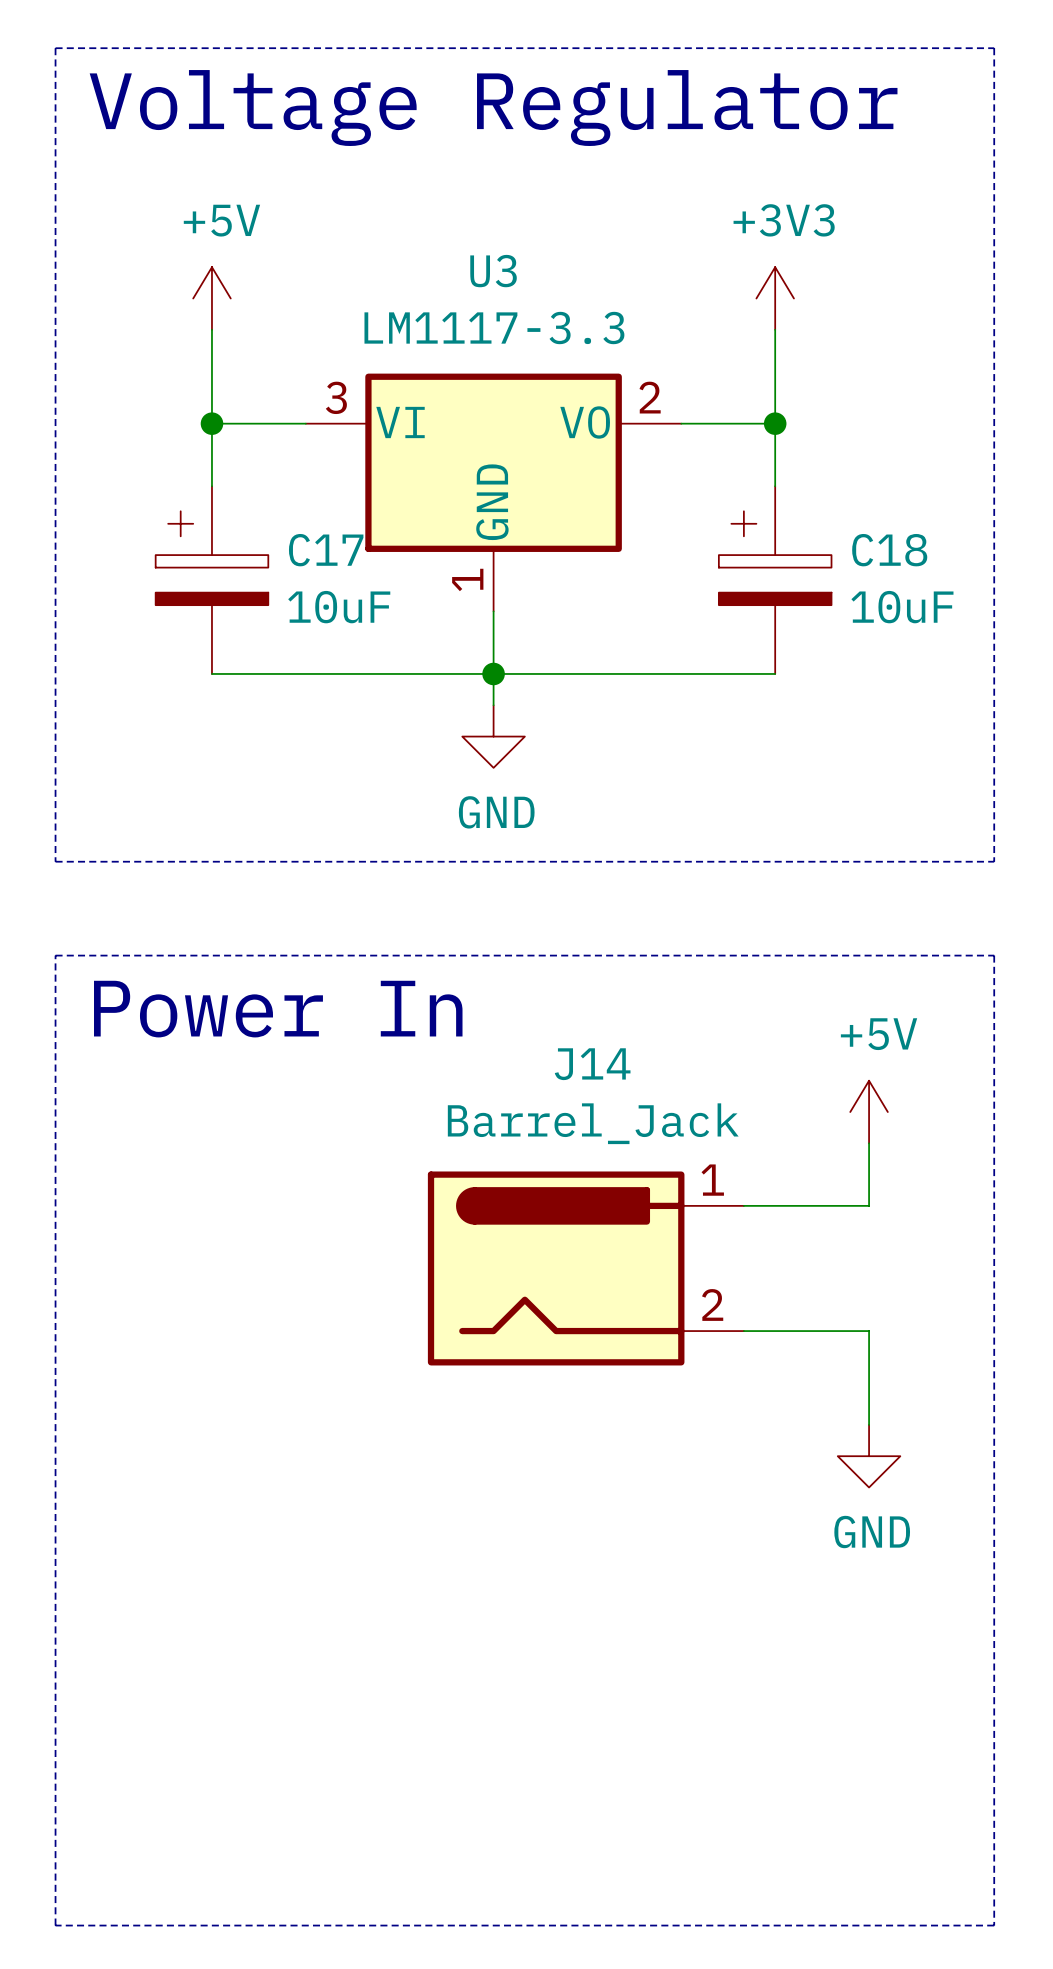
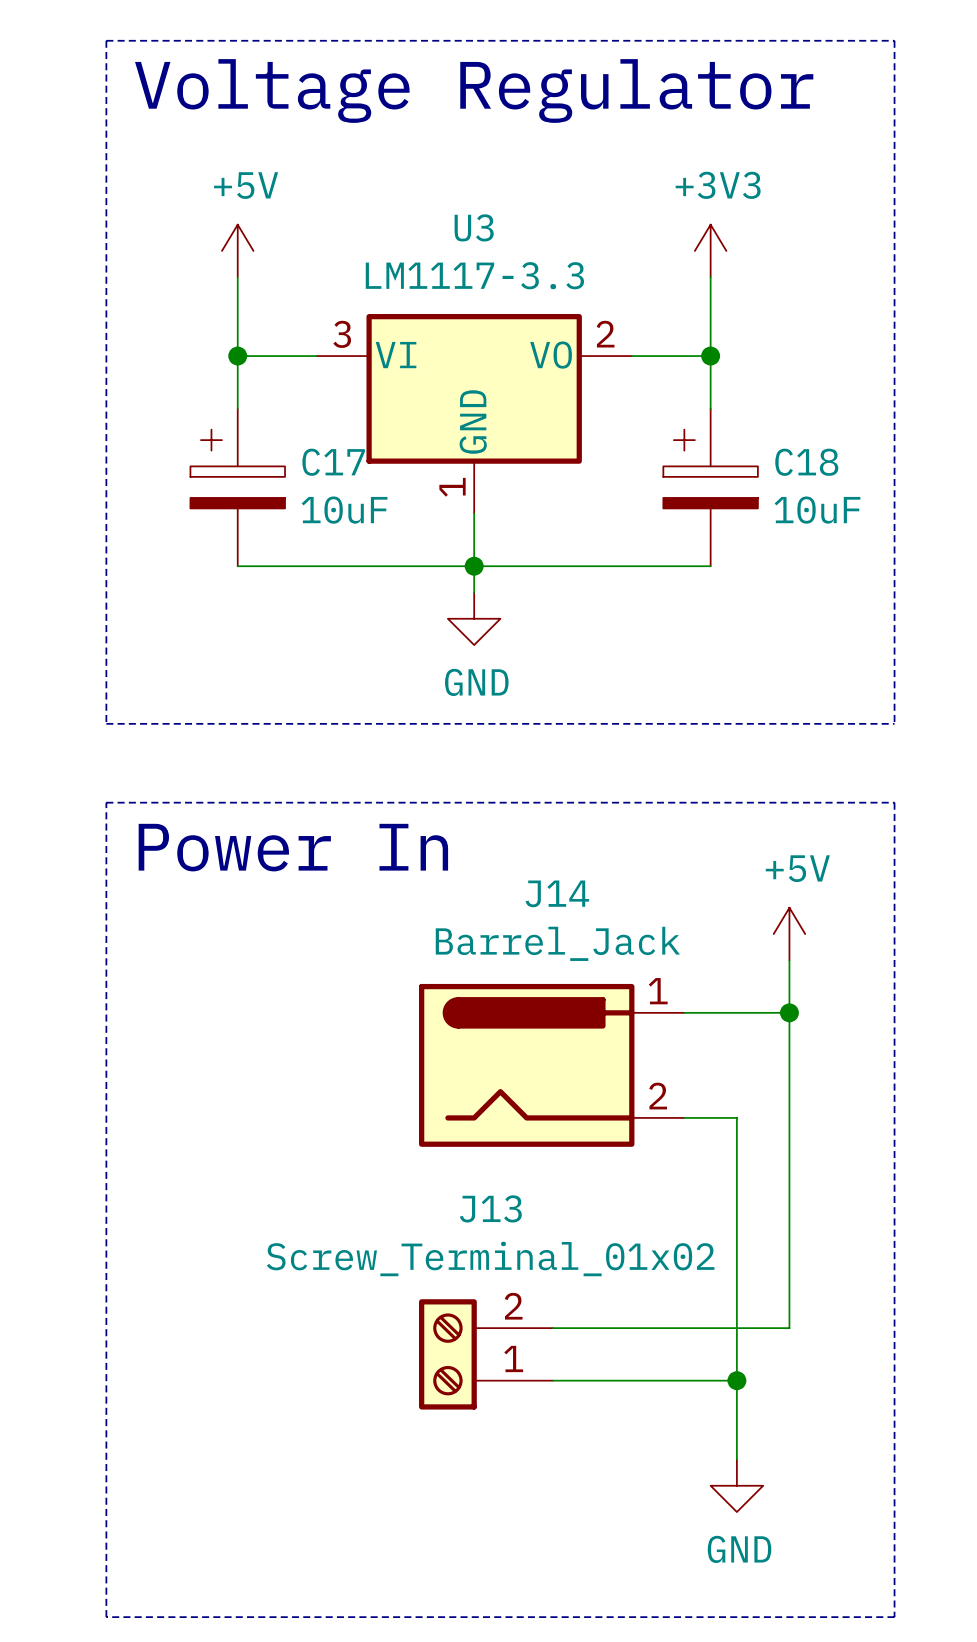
junction: none -> (789, 1012)
wire: (806, 1331) (869, 1331) -> (789, 1012) (789, 1117)
wire: none -> (736, 1117) (736, 1459)
wire: none -> (789, 1196) (789, 1328) (553, 1328)
power symbol position: GND (869, 1456) -> GND (736, 1485)
J13: none -> Screw_Terminal_01x02 (486, 1354)
wire: none -> (553, 1380) (736, 1380)
junction: none -> (736, 1380)

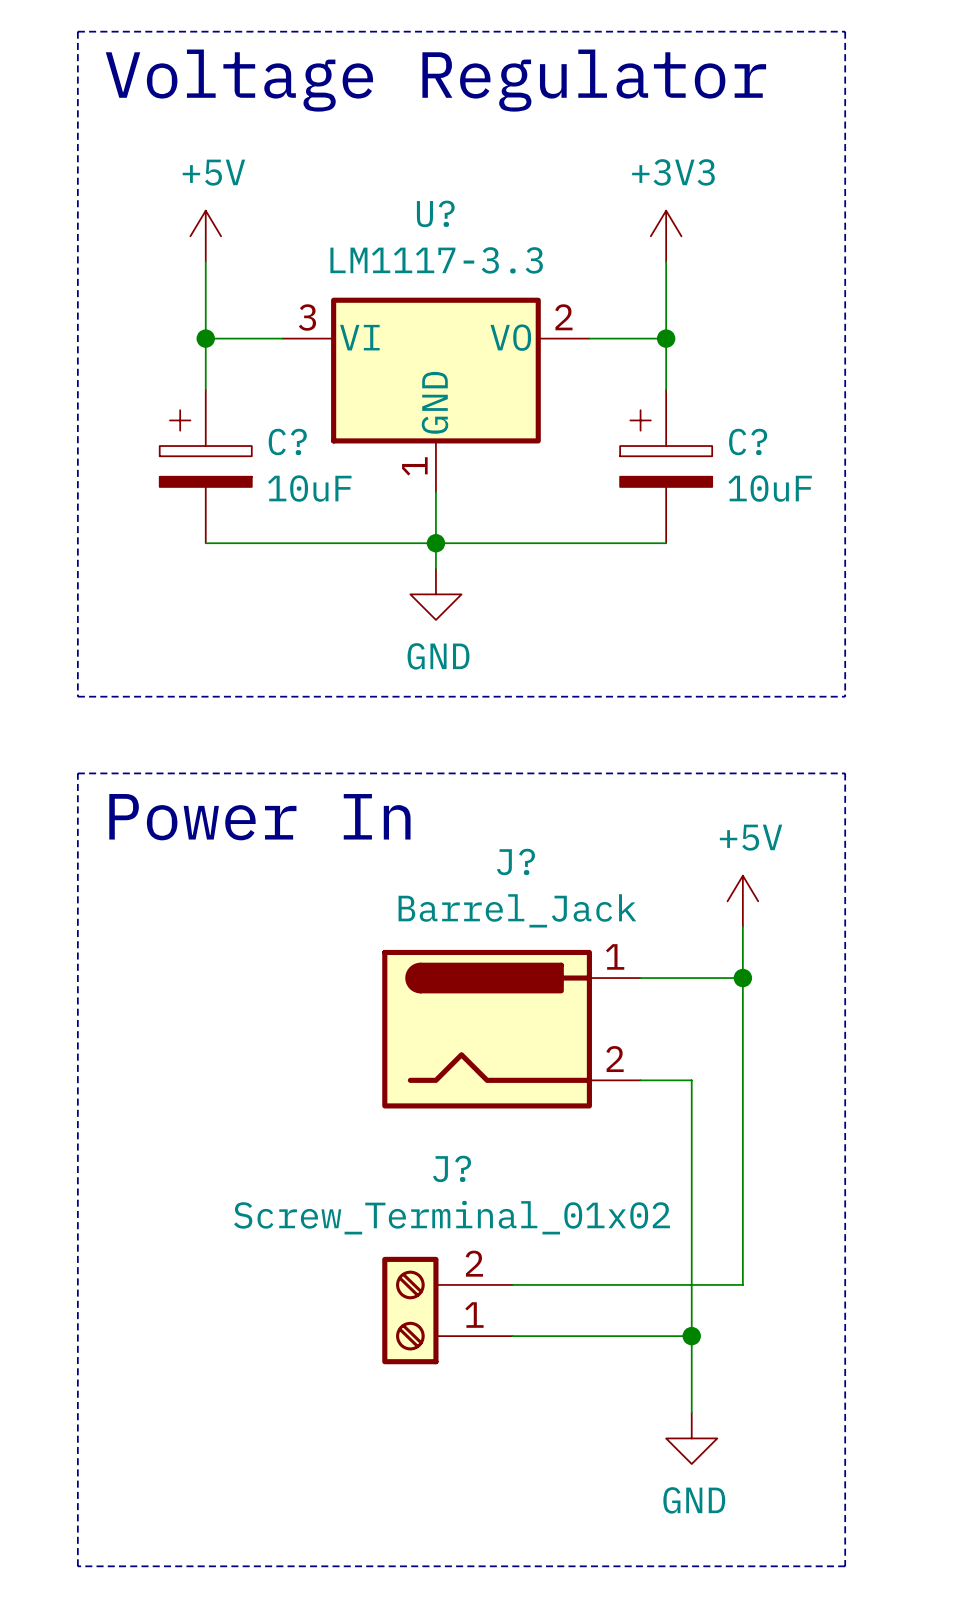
U3 name: U3 (474, 227) -> U? (435, 213)
C17 name: C17 (333, 462) -> C? (287, 442)
C18 name: C18 (806, 462) -> C? (748, 442)
J14 name: J14 (557, 893) -> J? (515, 861)
J13 name: J13 (490, 1208) -> J? (452, 1168)

